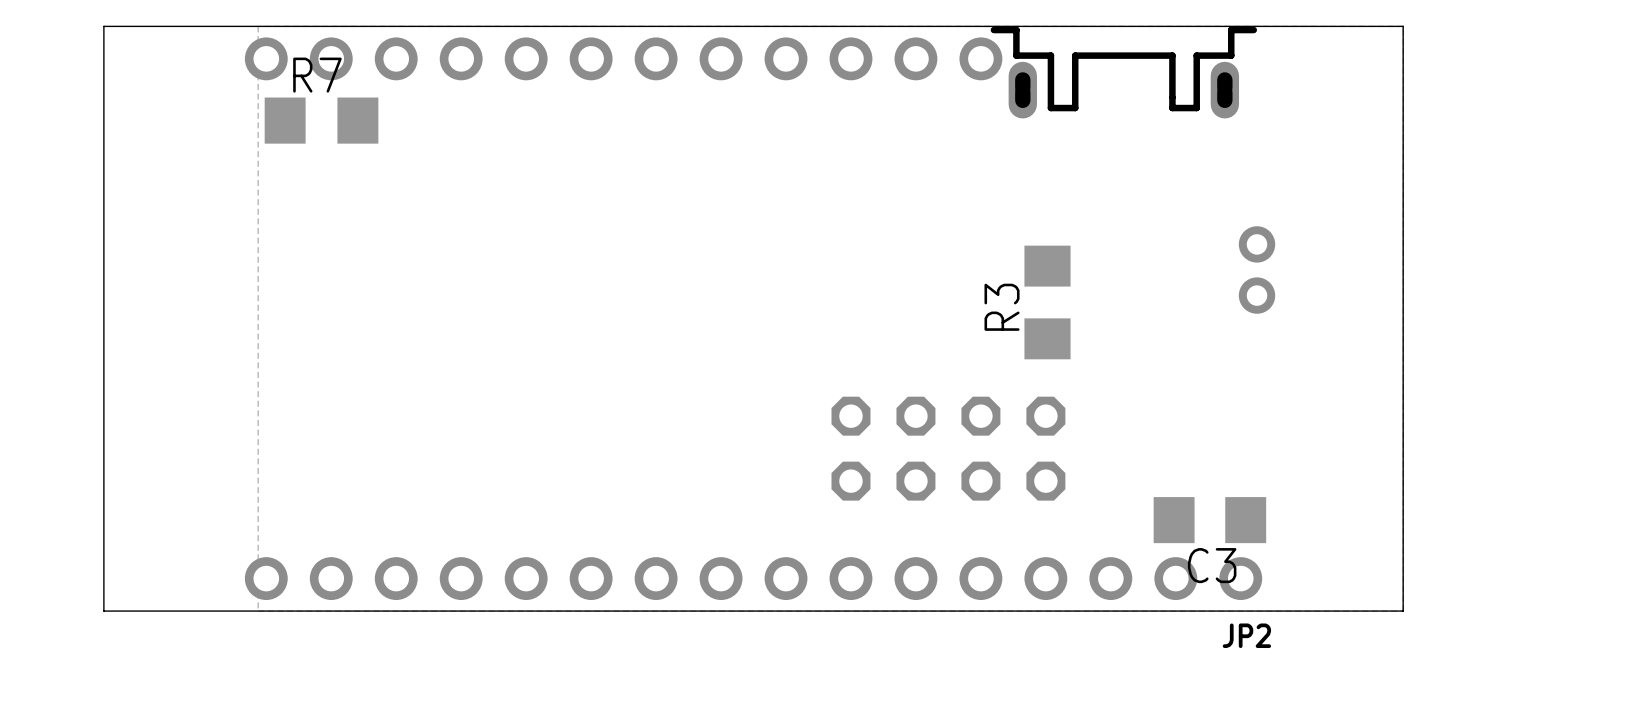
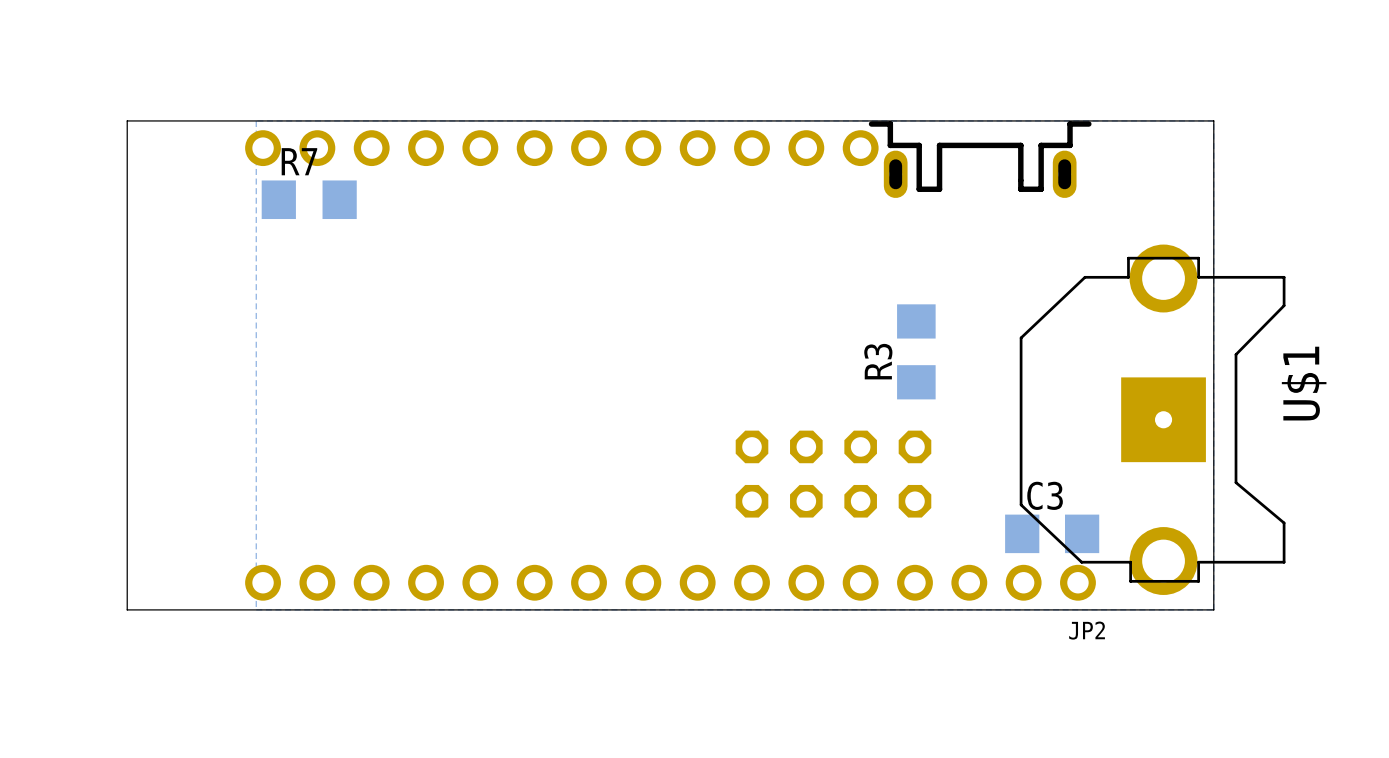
part: (1257, 270) -> none
U$1: none -> (1152, 419)
C3 name position: C3 (1212, 565) -> C3 (1045, 495)

